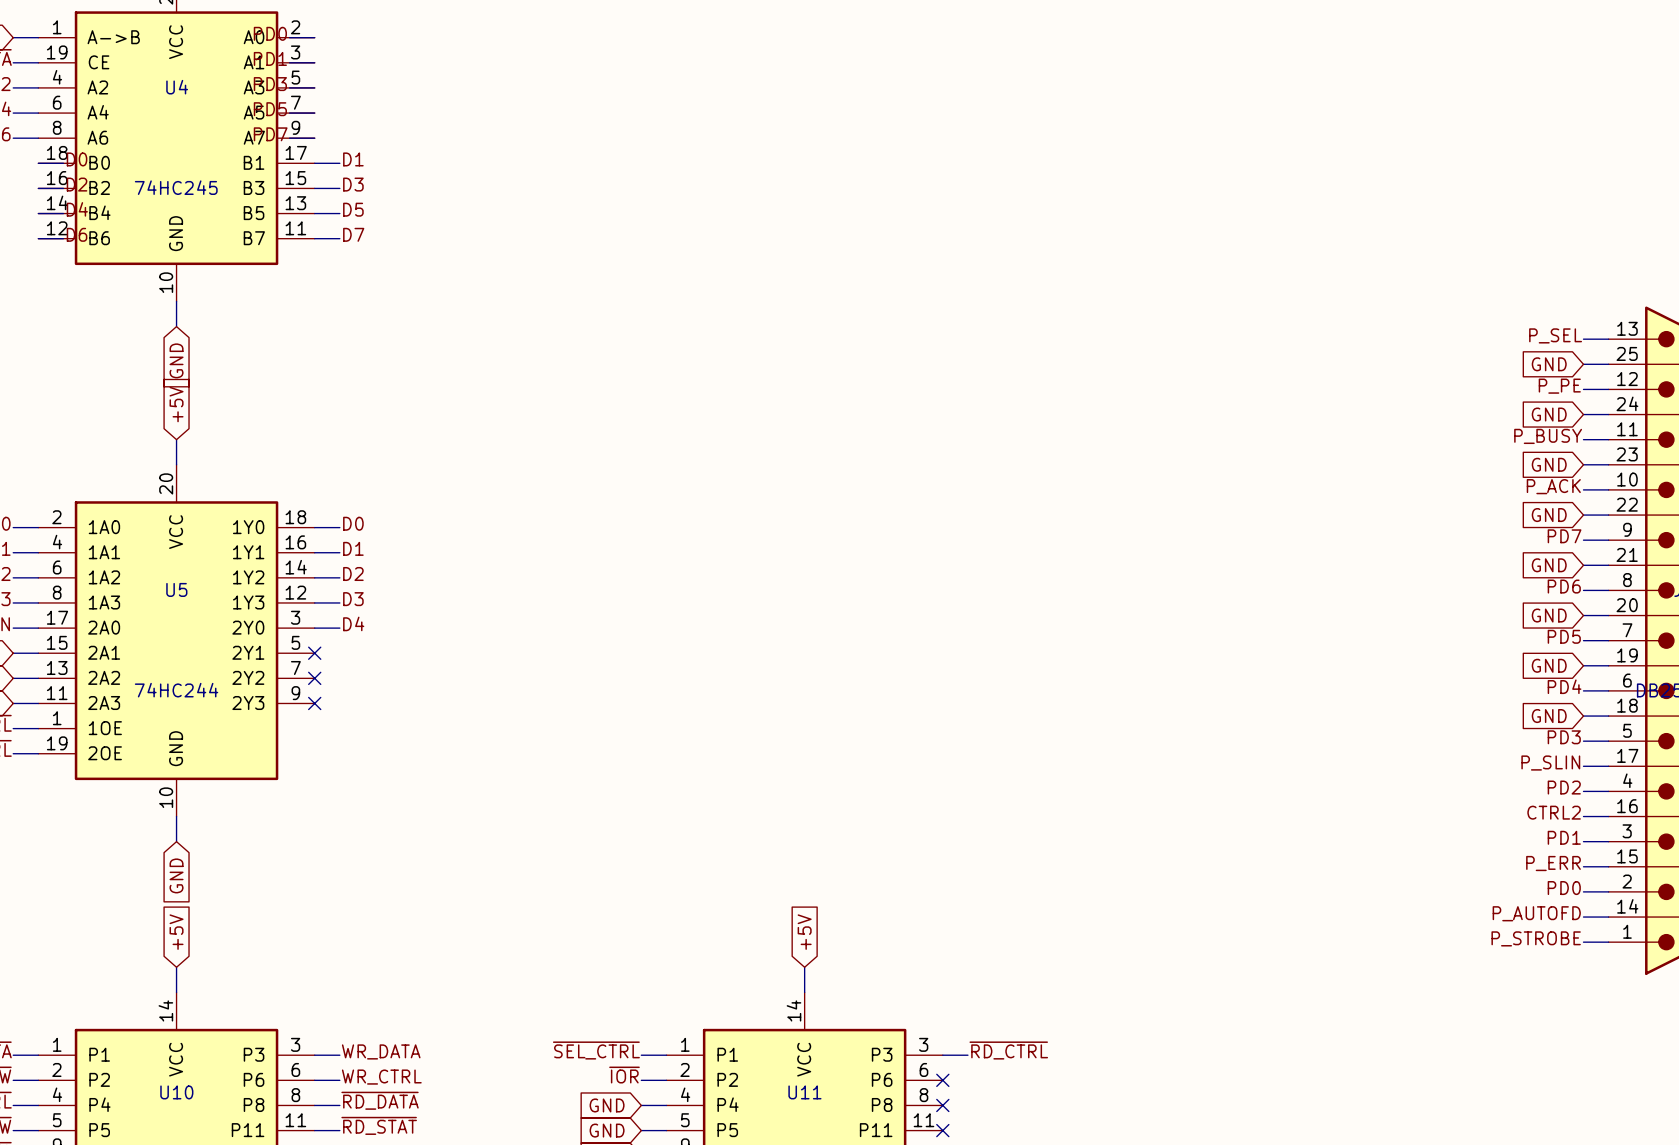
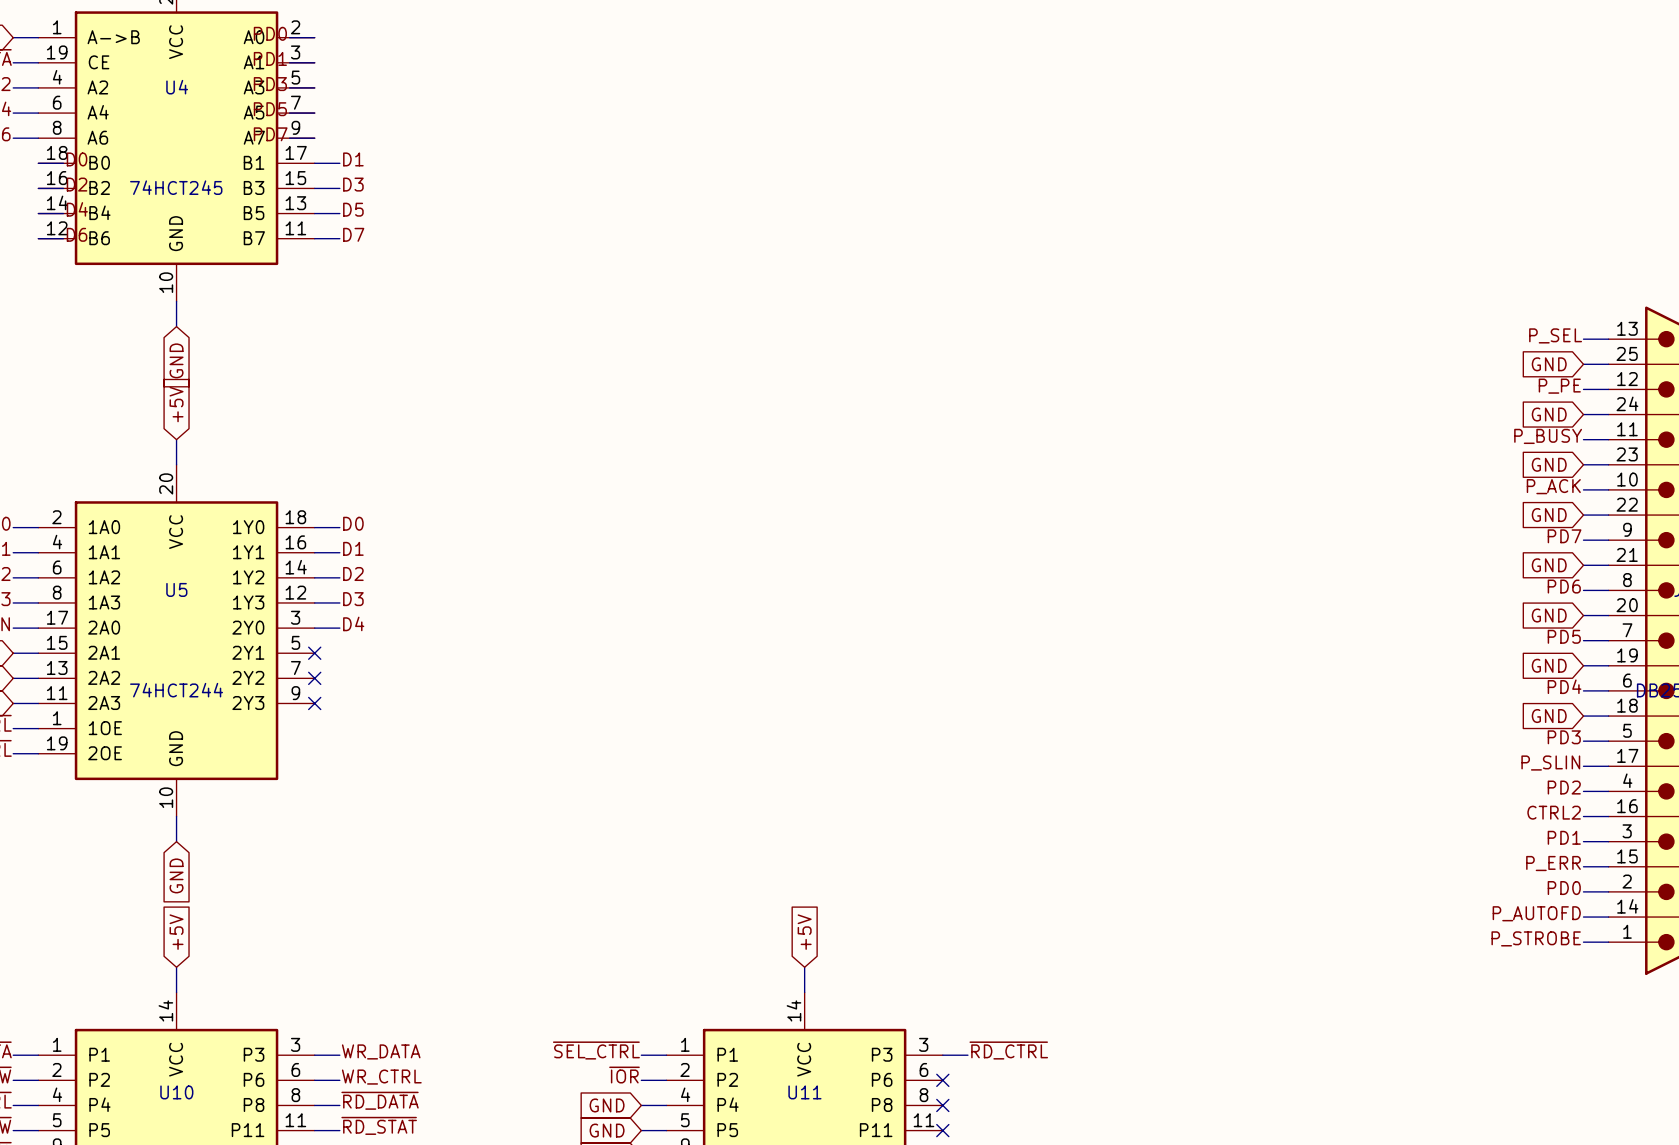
U4 value: 74HC245 (176, 187) -> 74HCT245 (176, 187)
U5 value: 74HC244 (176, 690) -> 74HCT244 (176, 690)

